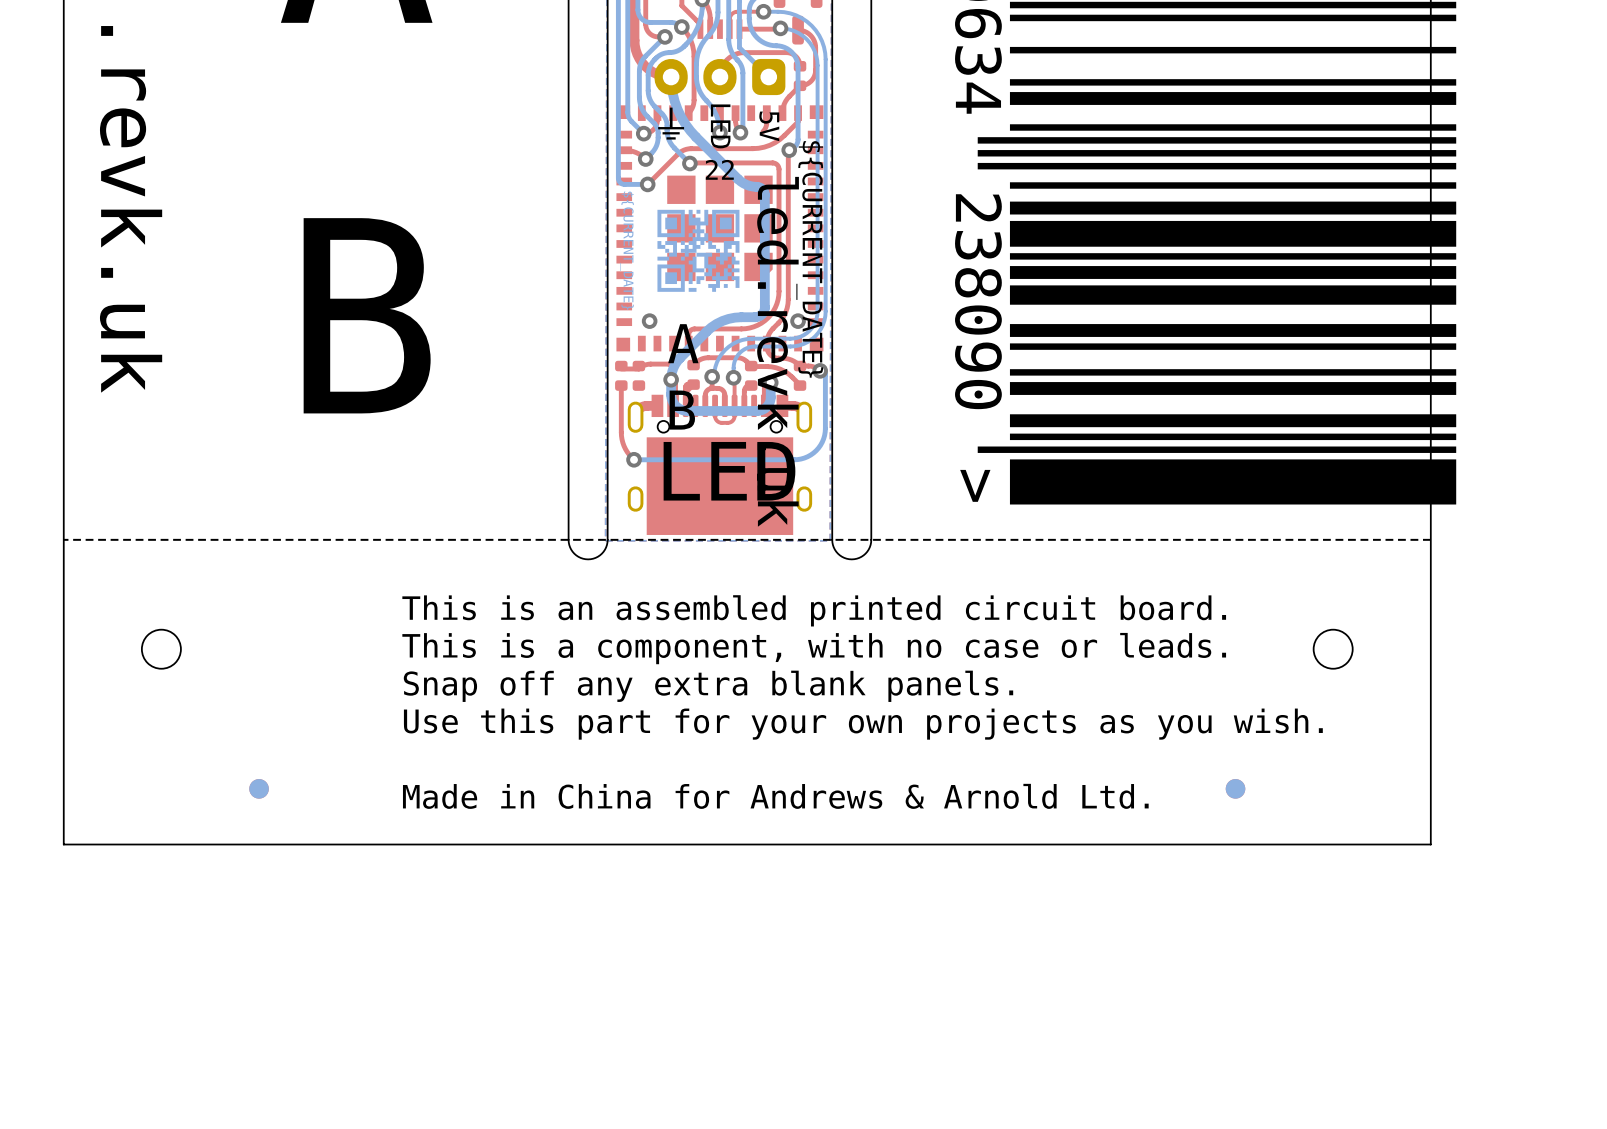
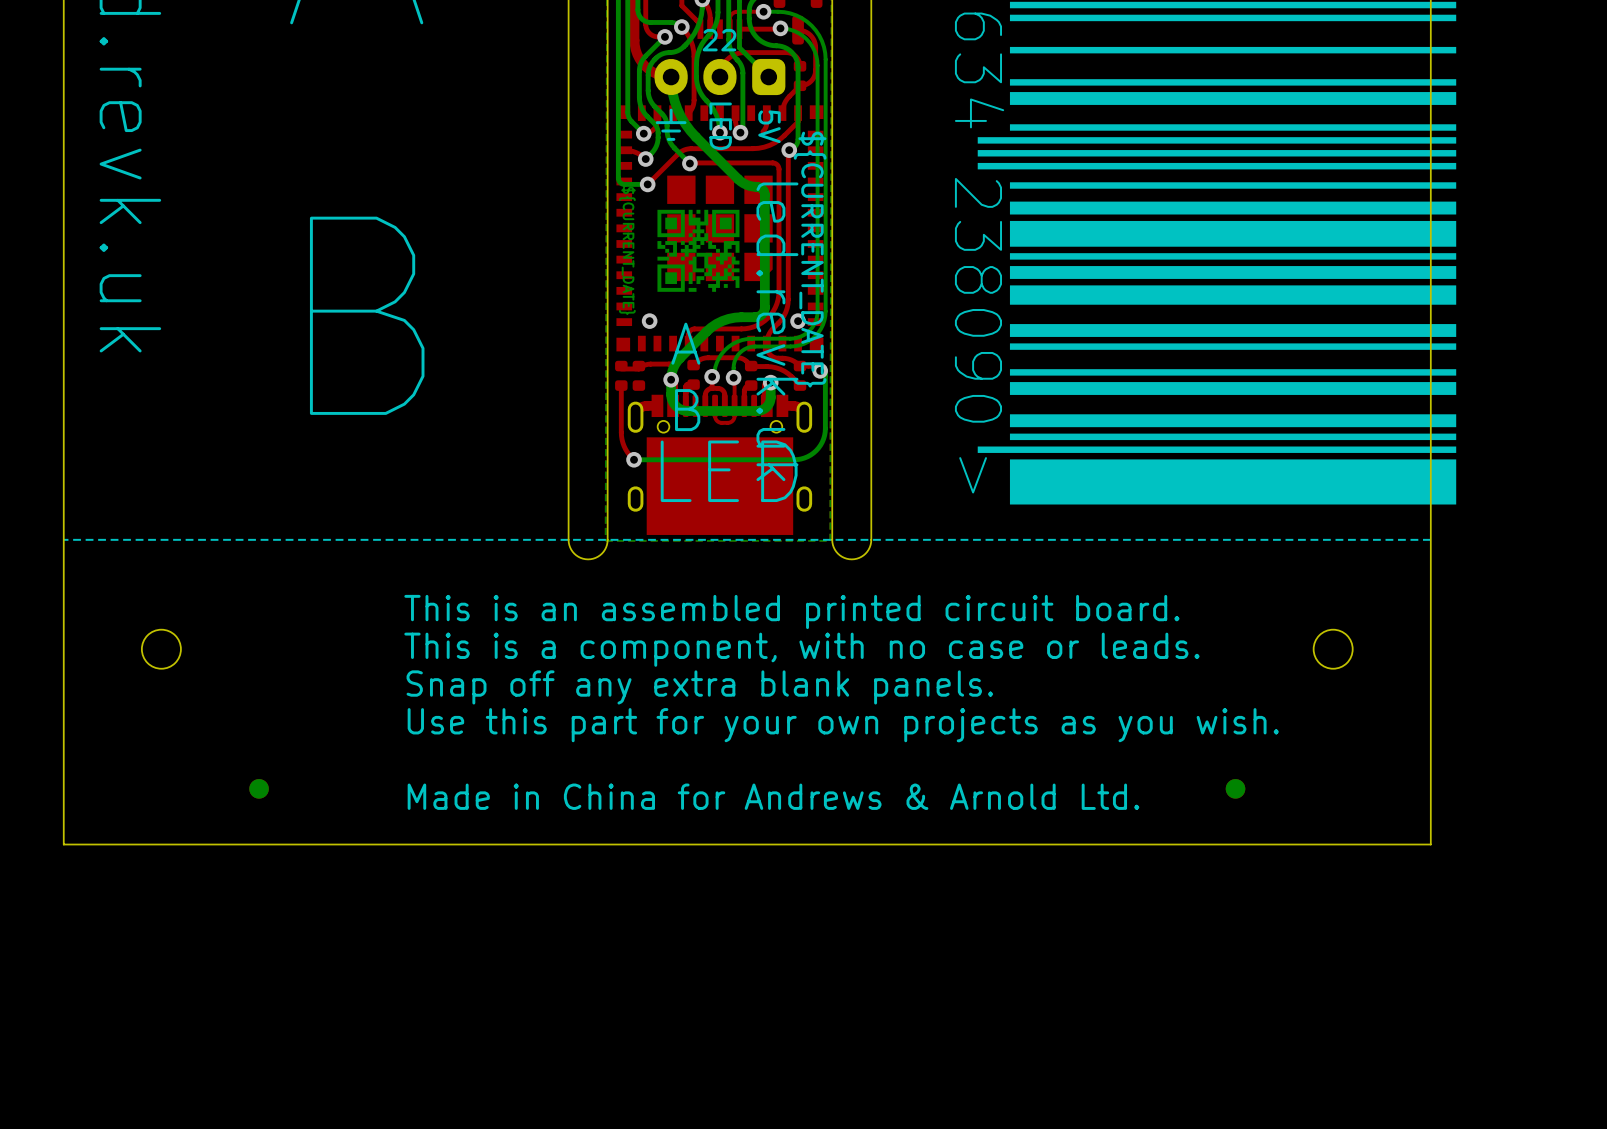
text position: 22 (719, 169) -> 22 (719, 40)

